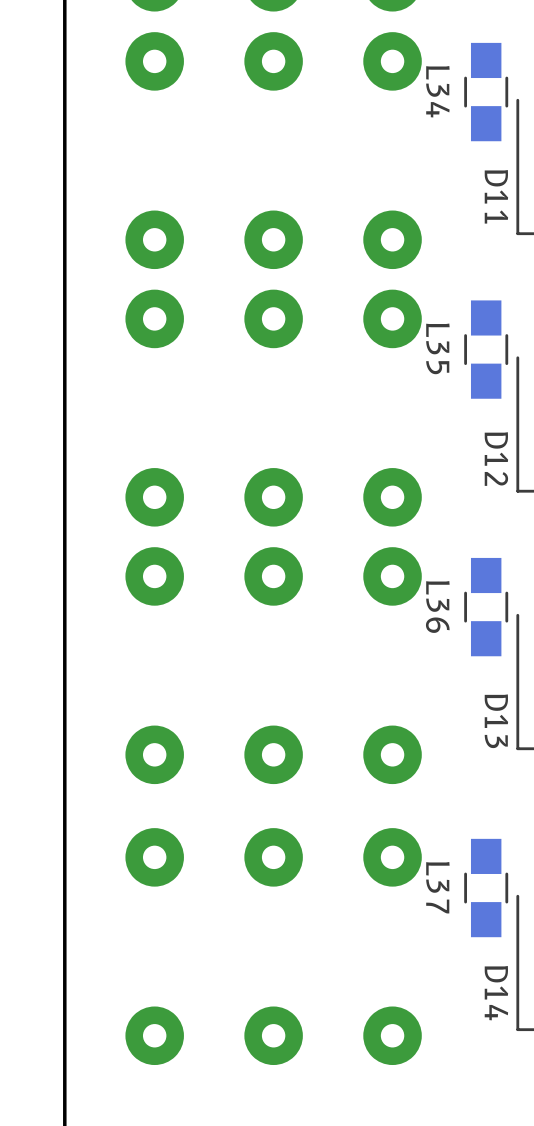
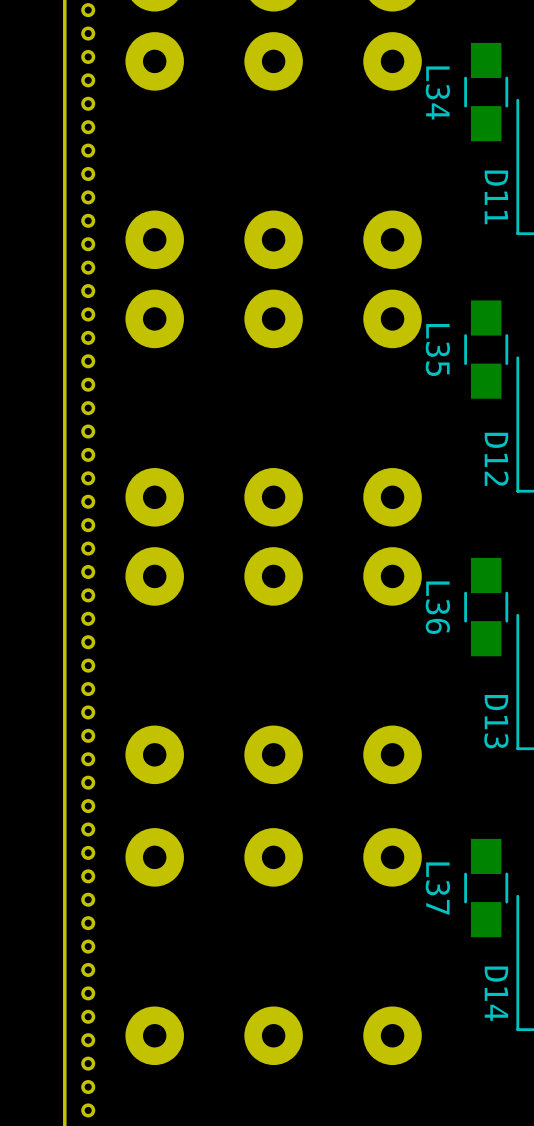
part: none -> (88, 10)
part: none -> (88, 33)
part: none -> (88, 56)
part: none -> (88, 80)
part: none -> (88, 103)
part: none -> (88, 127)
part: none -> (88, 150)
part: none -> (88, 174)
part: none -> (88, 197)
part: none -> (88, 220)
part: none -> (88, 244)
part: none -> (88, 267)
part: none -> (88, 291)
part: none -> (88, 314)
part: none -> (88, 337)
part: none -> (88, 361)
part: none -> (88, 384)
part: none -> (88, 408)
part: none -> (88, 431)
part: none -> (88, 454)
part: none -> (88, 478)
part: none -> (88, 501)
part: none -> (88, 525)
part: none -> (88, 548)
part: none -> (88, 571)
part: none -> (88, 595)
part: none -> (88, 618)
part: none -> (88, 642)
part: none -> (88, 665)
part: none -> (88, 689)
part: none -> (88, 712)
part: none -> (88, 735)
part: none -> (88, 759)
part: none -> (88, 782)
part: none -> (88, 806)
part: none -> (88, 829)
part: none -> (88, 852)
part: none -> (88, 876)
part: none -> (88, 899)
part: none -> (88, 923)
part: none -> (88, 946)
part: none -> (88, 969)
part: none -> (88, 993)
part: none -> (88, 1016)
part: none -> (88, 1040)
part: none -> (88, 1063)
part: none -> (88, 1087)
part: none -> (88, 1110)

